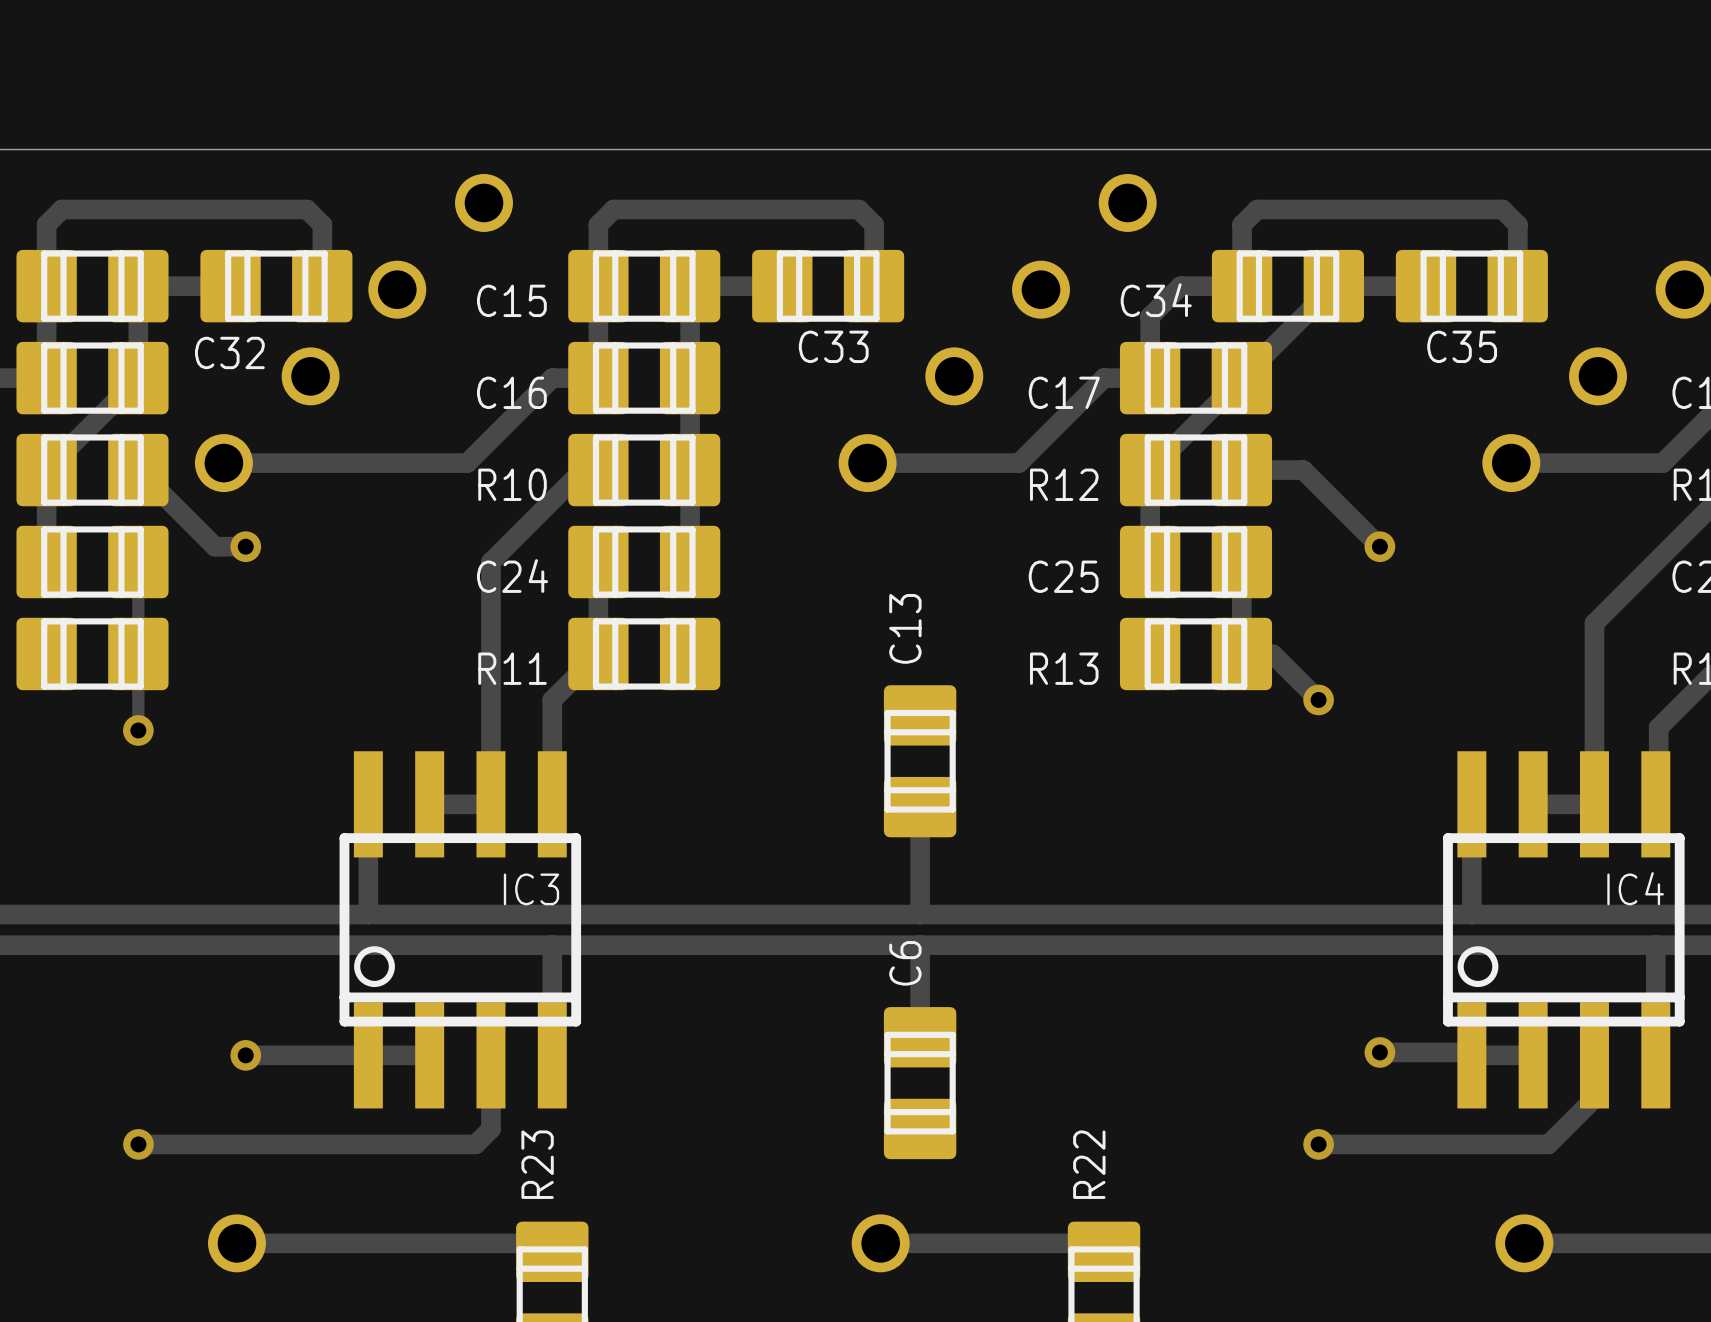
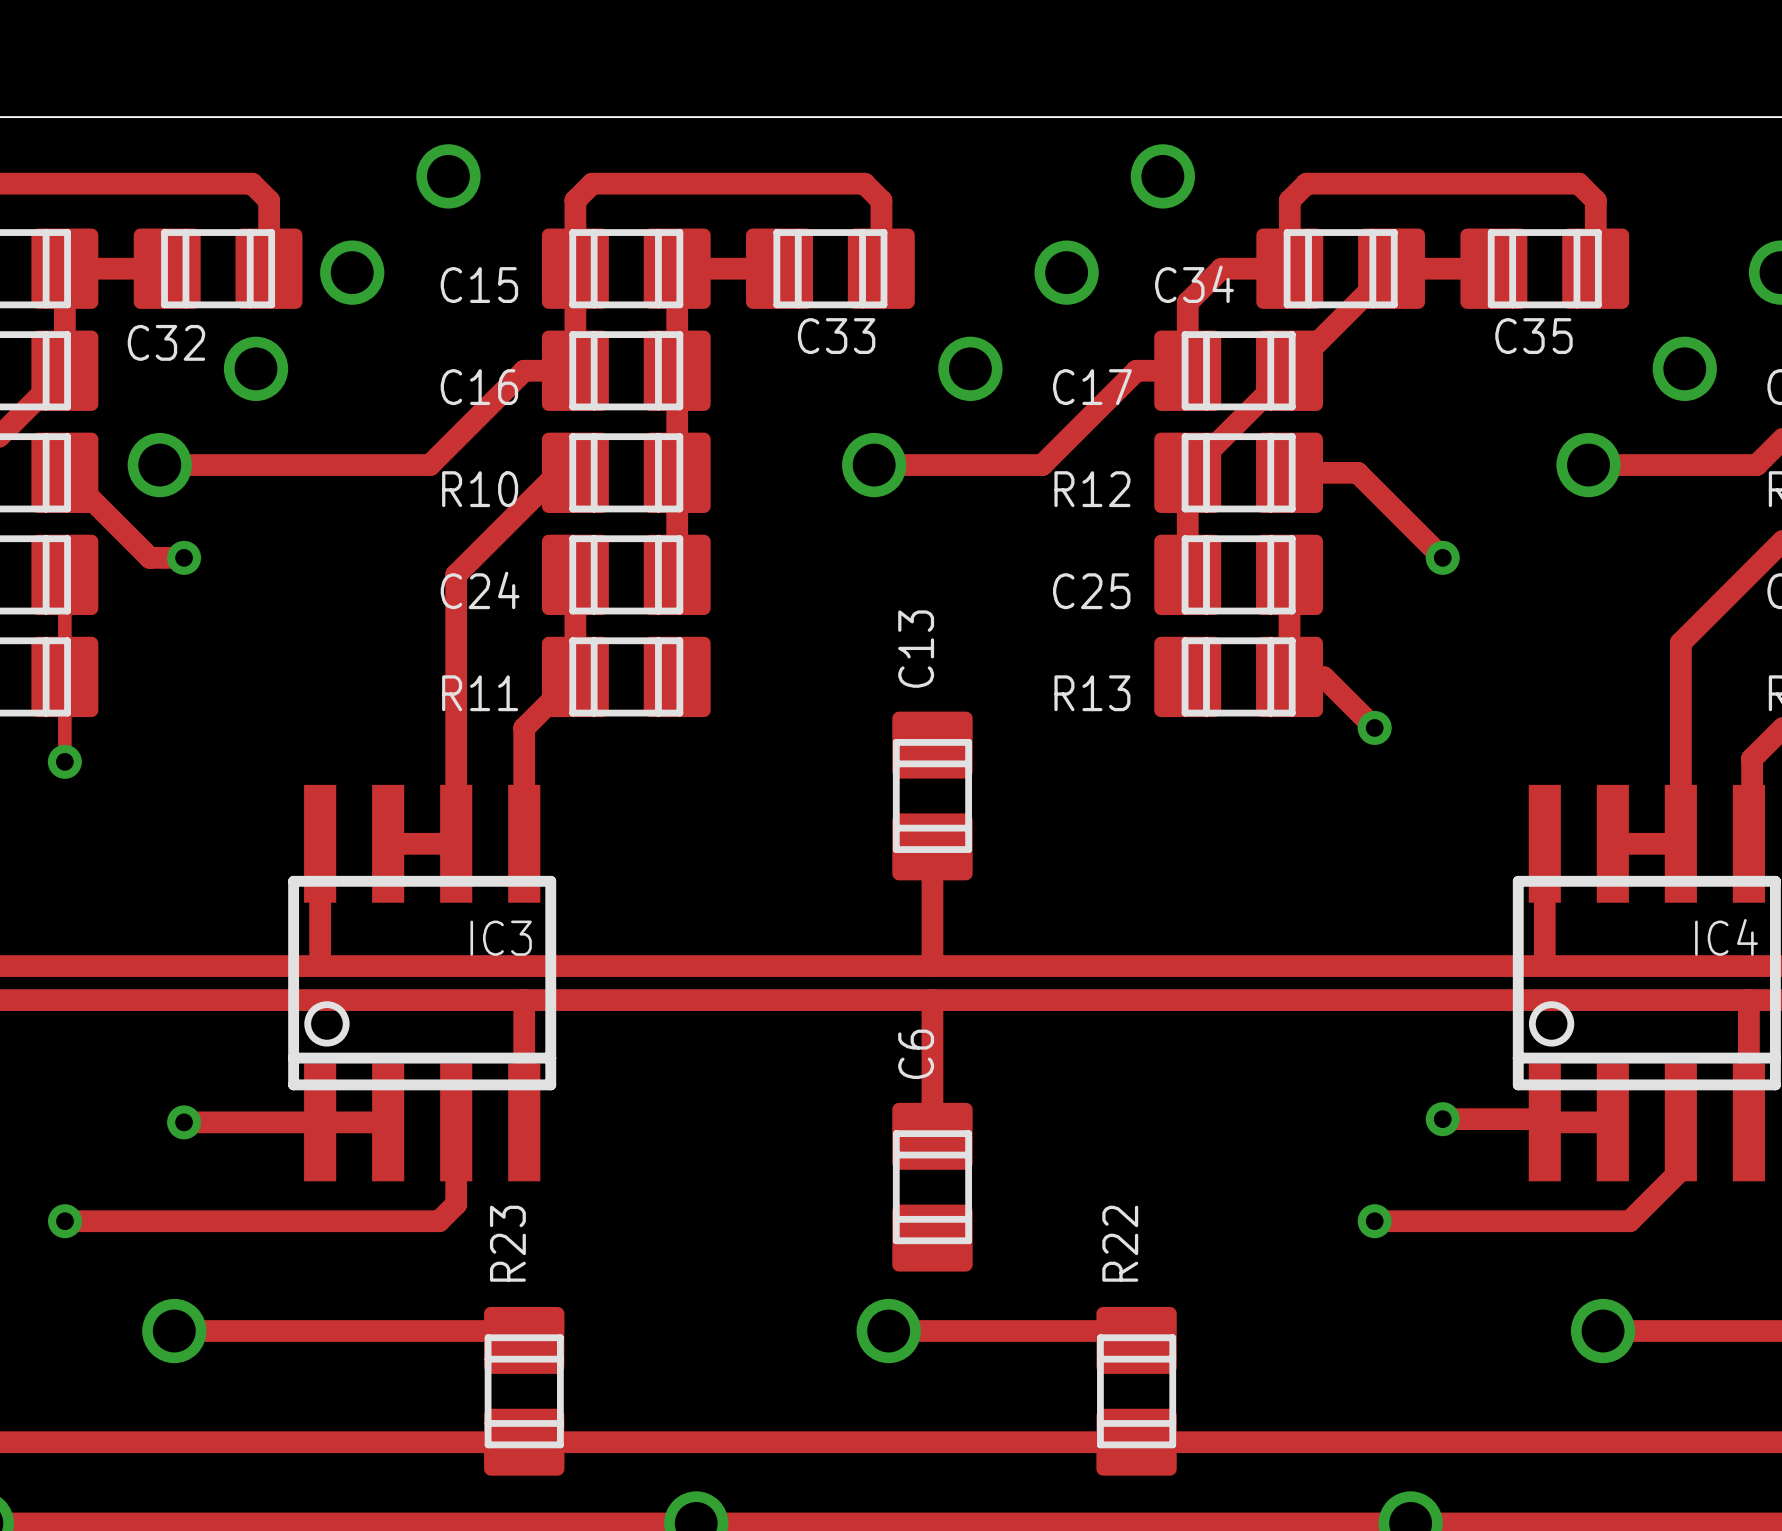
C6 position: (920, 1083) -> (932, 1187)

